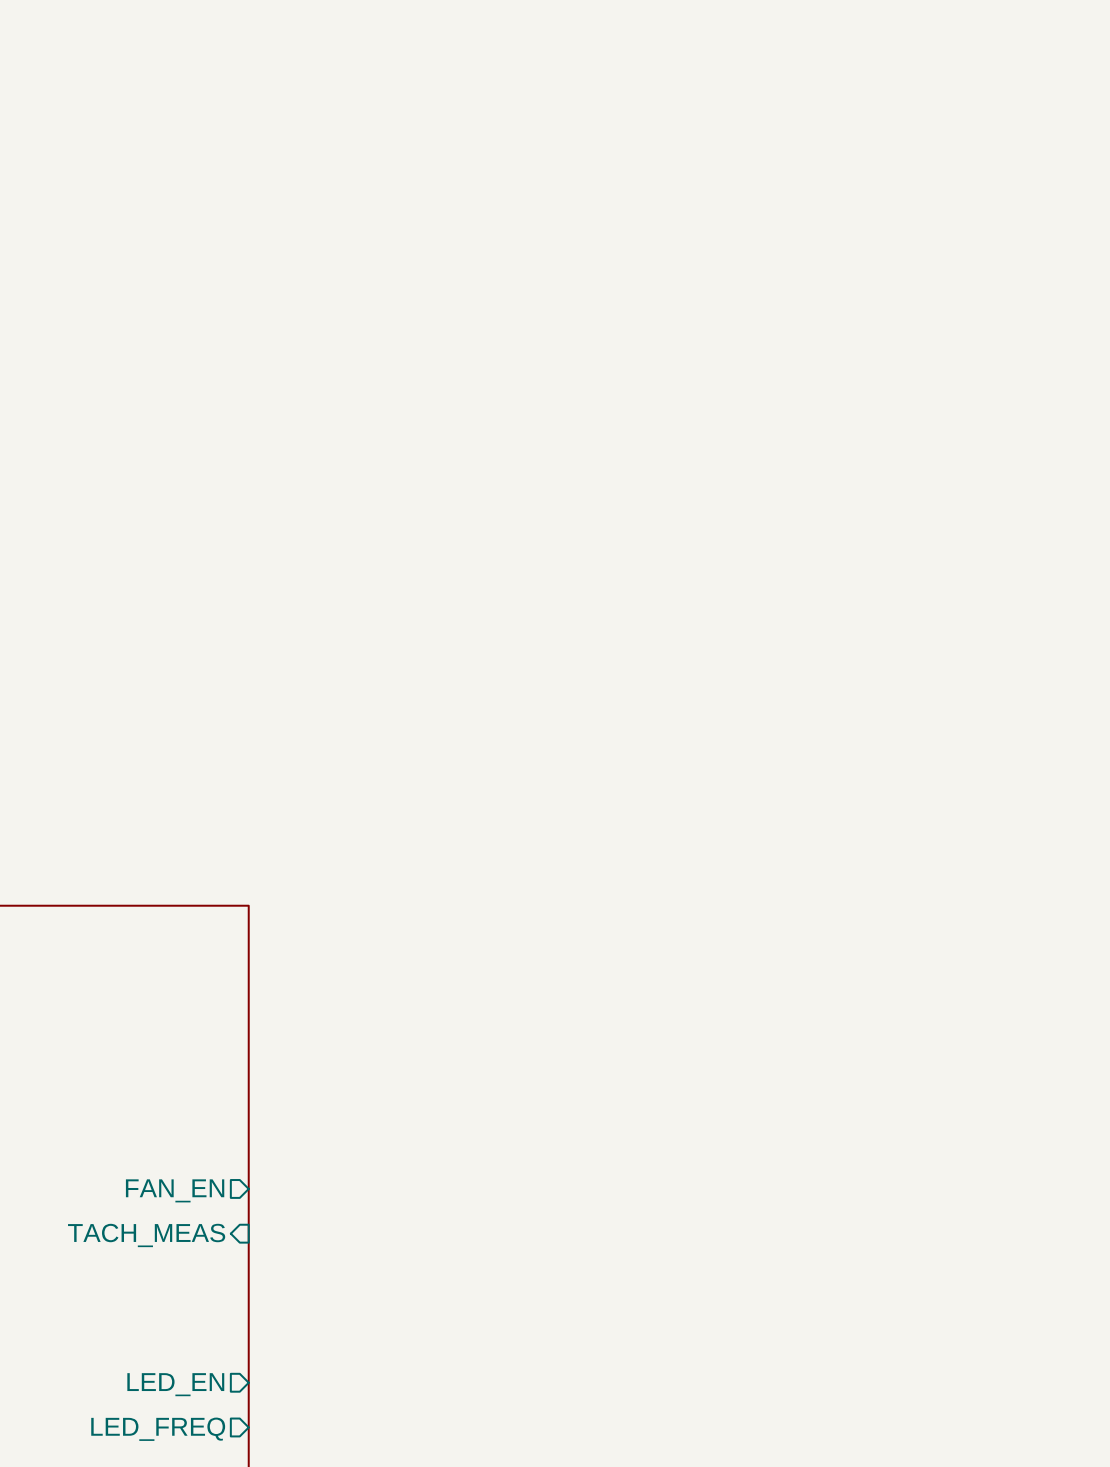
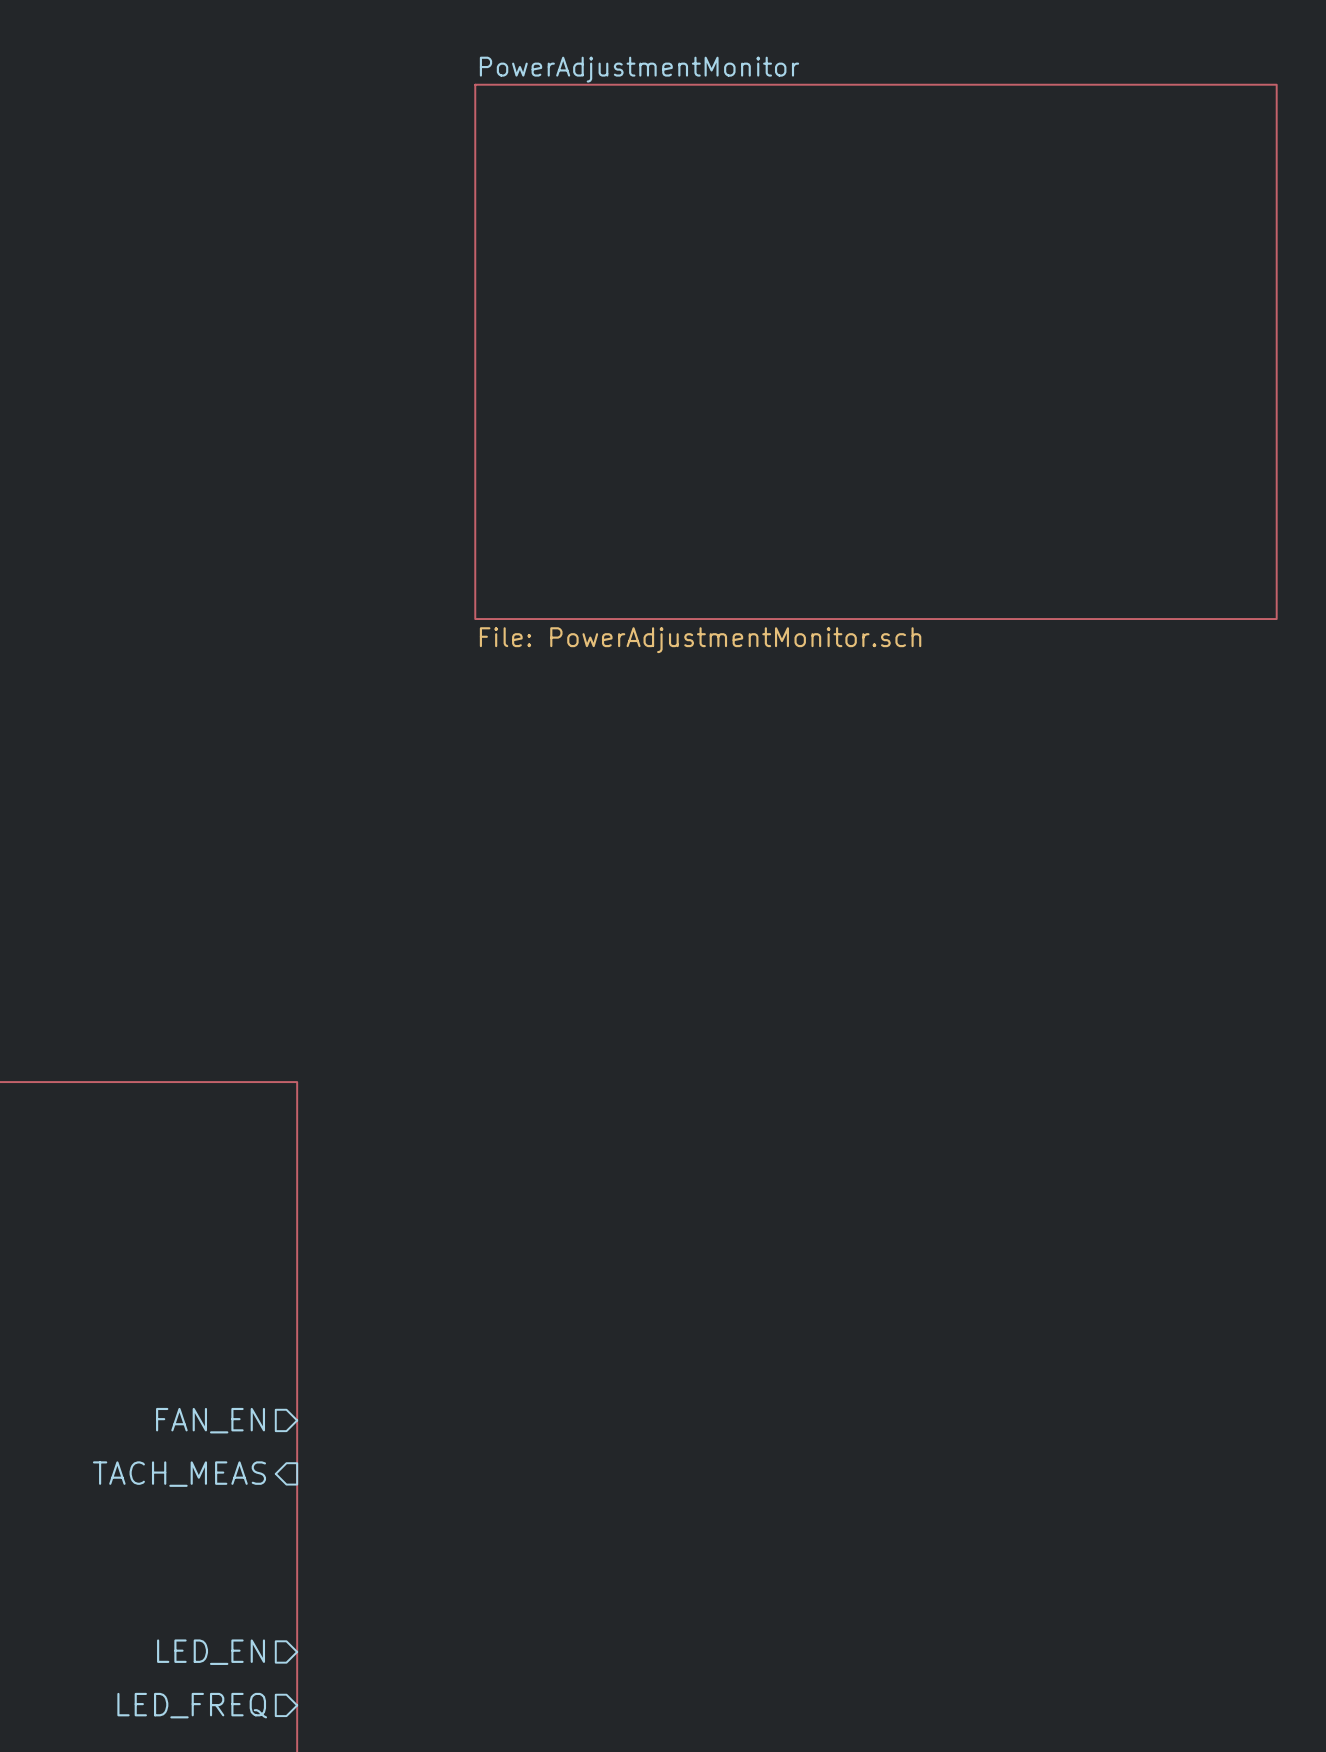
sheet PowerAdjustmentMonitor: none -> File: PowerAdjustmentMonitor.sch (875, 351)

